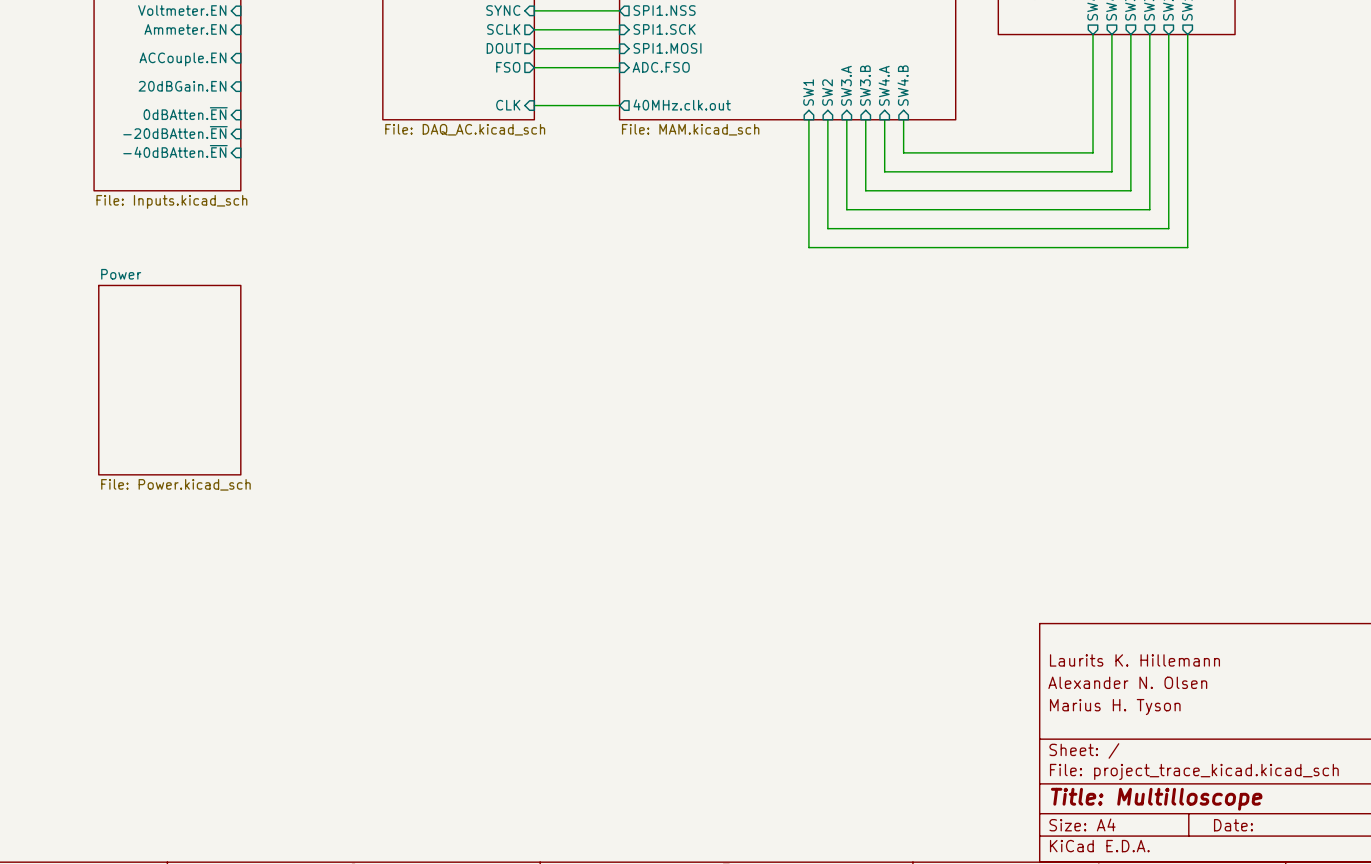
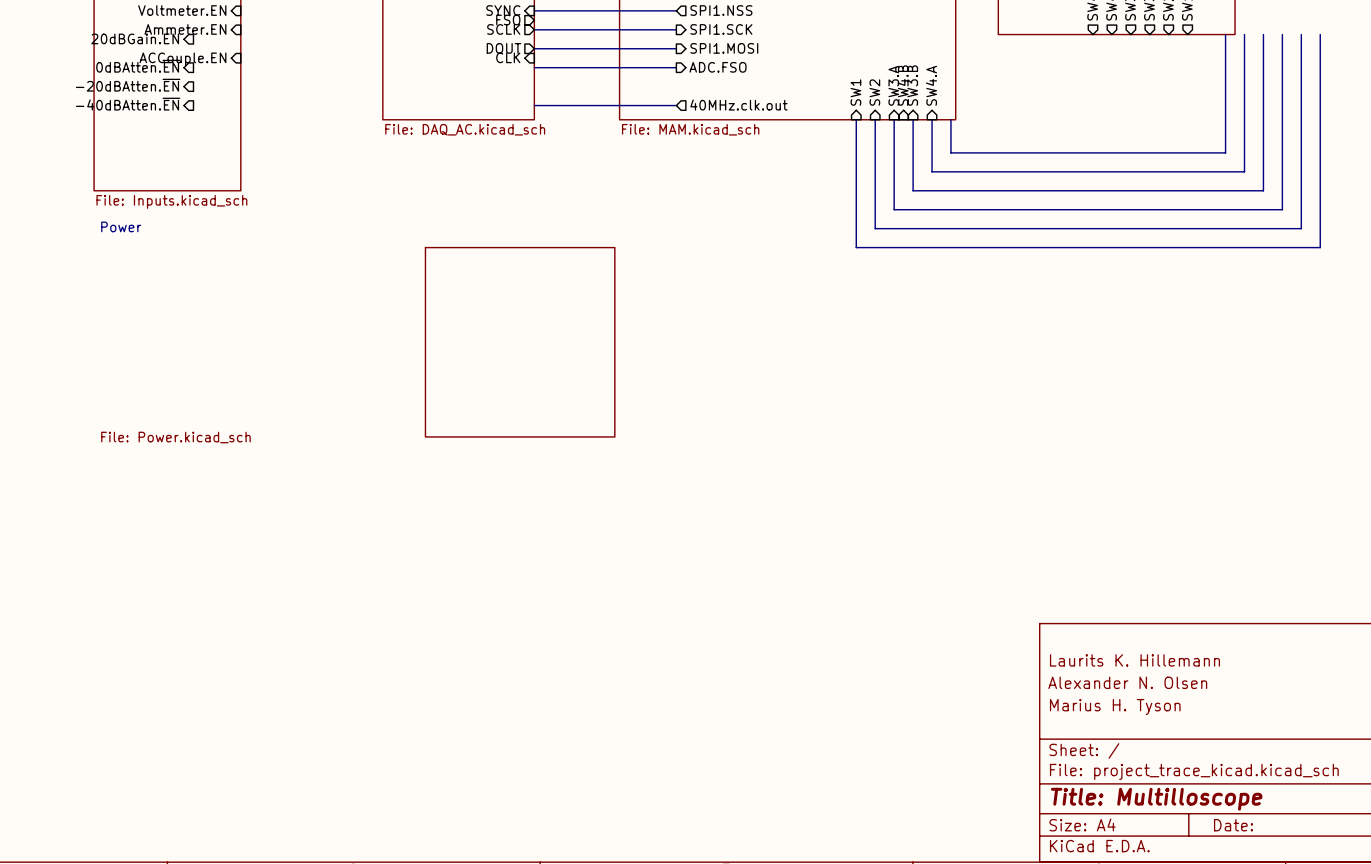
wire: none -> (619, 10) (676, 10)
sheet pin position: SPI1.NSS (664, 10) -> SPI1.NSS (721, 10)
wire: none -> (619, 29) (676, 29)
sheet pin position: SPI1.SCK (664, 29) -> SPI1.SCK (721, 29)
wire: (1093, 34) (1093, 152) -> (1225, 34) (1225, 152) (1093, 152)
wire: (1111, 34) (1111, 171) -> (1244, 34) (1244, 171) (1111, 171)
wire: (1130, 34) (1130, 190) -> (1263, 34) (1263, 190) (1130, 190)
wire: (1149, 34) (1149, 209) -> (1282, 34) (1282, 209) (1149, 209)
wire: (1168, 34) (1168, 228) -> (1301, 34) (1301, 228) (1168, 228)
wire: (1187, 34) (1187, 247) -> (1320, 34) (1320, 247) (1187, 247)
wire: none -> (619, 48) (676, 48)
sheet pin position: SPI1.MOSI (667, 48) -> SPI1.MOSI (724, 48)
sheet pin position: FSO (508, 67) -> FSO (508, 19)
wire: none -> (619, 67) (676, 67)
sheet pin position: ADC.FSO (661, 67) -> ADC.FSO (718, 67)
sheet pin position: SW3.A (846, 85) -> SW3.A (893, 85)
sheet pin position: SW3.B (865, 85) -> SW3.B (912, 85)
sheet pin position: SW4.A (884, 85) -> SW4.A (931, 85)
sheet pin position: 20dBGain.EN (182, 86) -> 20dBGain.EN (135, 38)
sheet pin position: SW1 (808, 92) -> SW1 (855, 92)
sheet pin position: SW2 (827, 92) -> SW2 (874, 92)
sheet pin position: 40MHz.clk.out (682, 104) -> 40MHz.clk.out (738, 104)
sheet pin position: CLK (508, 105) -> CLK (508, 57)
wire: none -> (619, 105) (676, 105)
sheet pin position: 0dBAtten.~{EN} (185, 113) -> 0dBAtten.~{EN} (138, 66)
wire: (808, 119) (808, 247) (856, 247) -> (856, 119) (856, 247)
wire: (827, 119) (827, 228) (875, 228) -> (875, 119) (875, 228)
wire: (846, 119) (846, 209) (894, 209) -> (894, 119) (894, 209)
wire: (865, 119) (865, 190) (913, 190) -> (913, 119) (913, 190)
wire: (884, 119) (884, 171) (932, 171) -> (932, 119) (932, 171)
wire: (903, 119) (903, 152) (950, 152) -> (950, 119) (950, 152)
sheet pin position: -20dBAtten.~{EN} (175, 132) -> -20dBAtten.~{EN} (128, 85)
sheet pin position: -40dBAtten.~{EN} (175, 151) -> -40dBAtten.~{EN} (128, 104)
sheet Power: none -> File: Power.kicad_sch (520, 342)
sheet Power: File: Power.kicad_sch (169, 380) -> none

